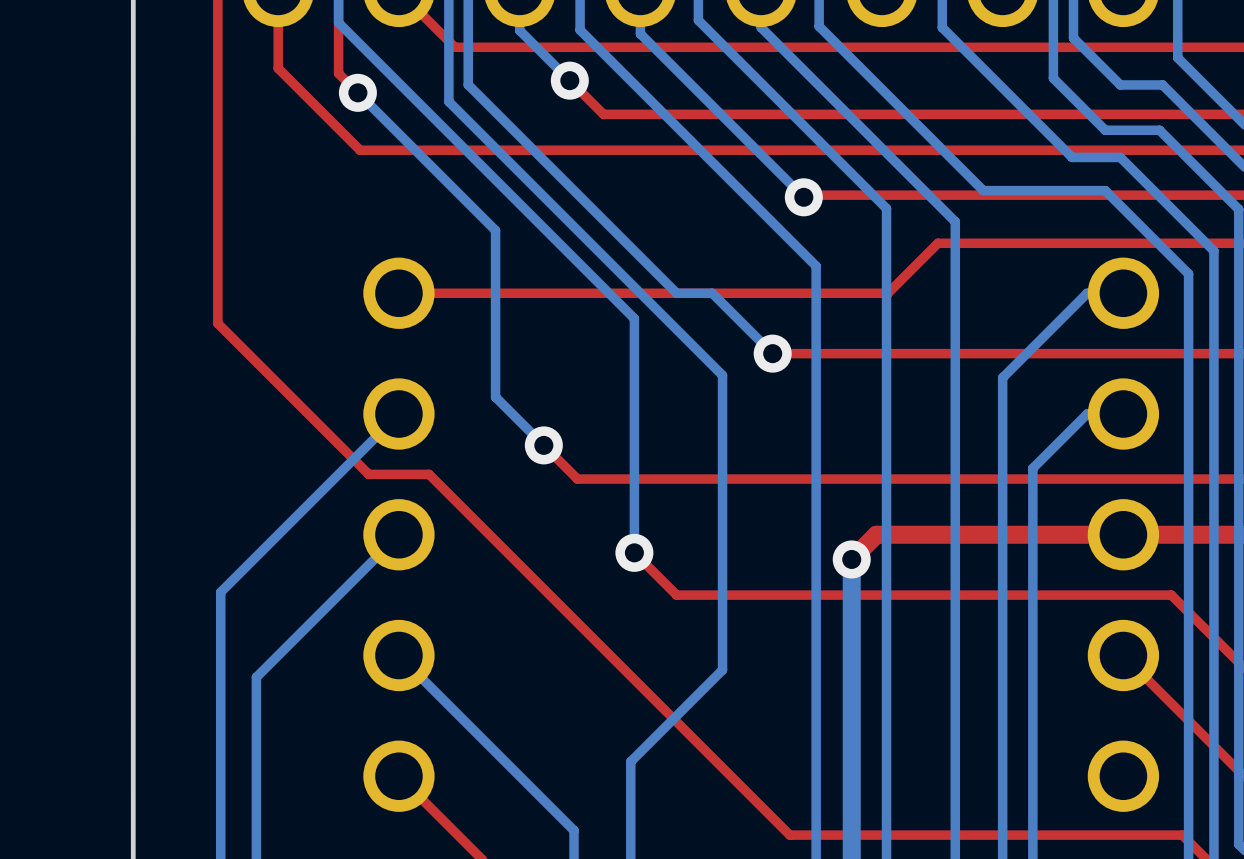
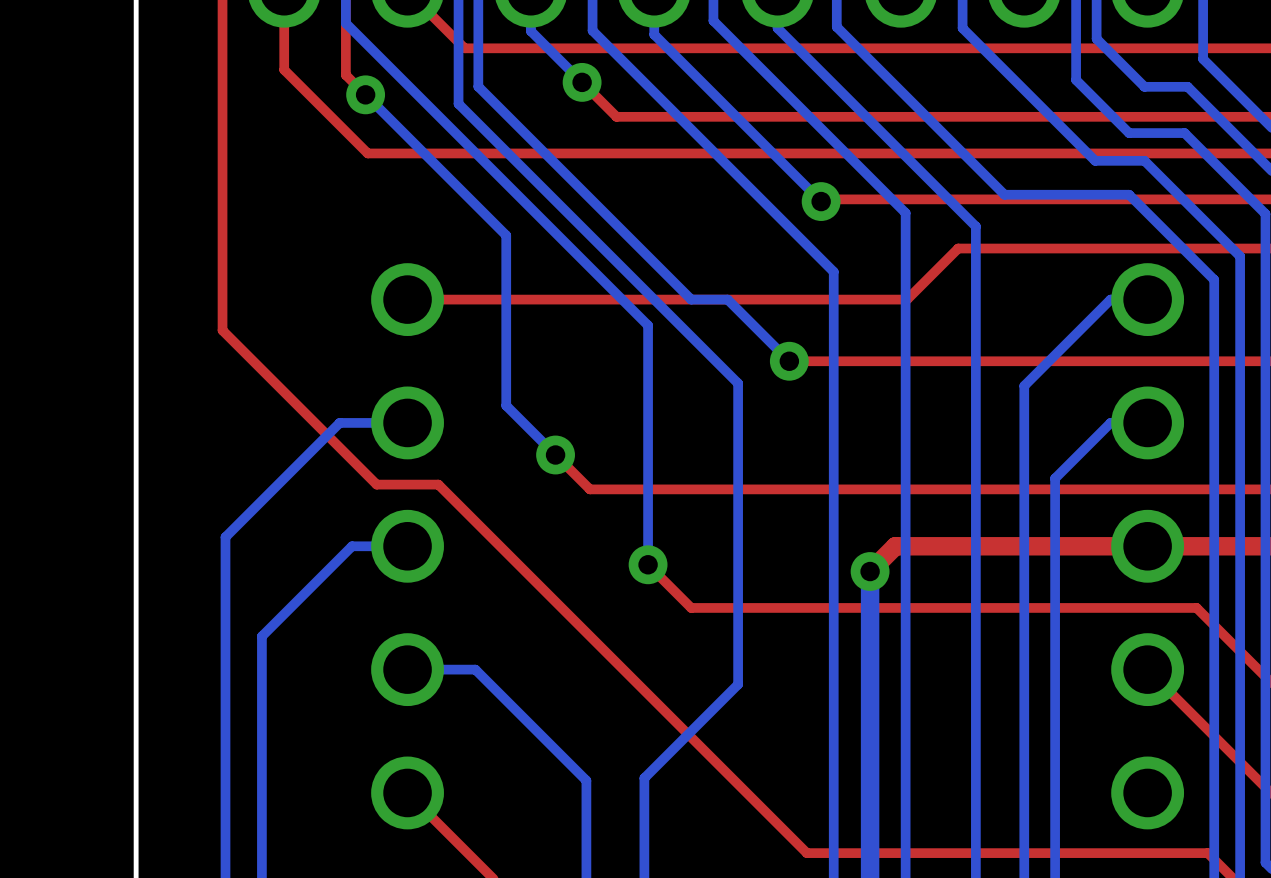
bottom track: (398, 414) (220, 592) -> (407, 422) (339, 422) (225, 537) (225, 604)
bottom track: (398, 534) (256, 677) -> (407, 546) (352, 546) (261, 636) (261, 691)
bottom track: (398, 655) (574, 830) -> (407, 669) (475, 669) (586, 780) (586, 848)

